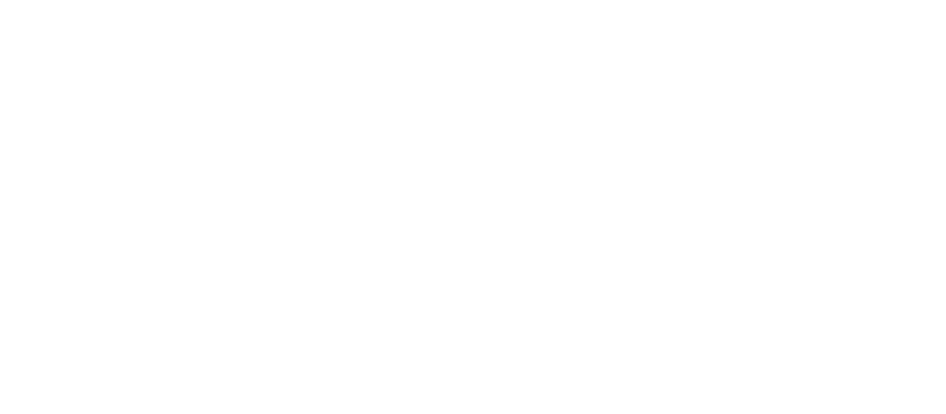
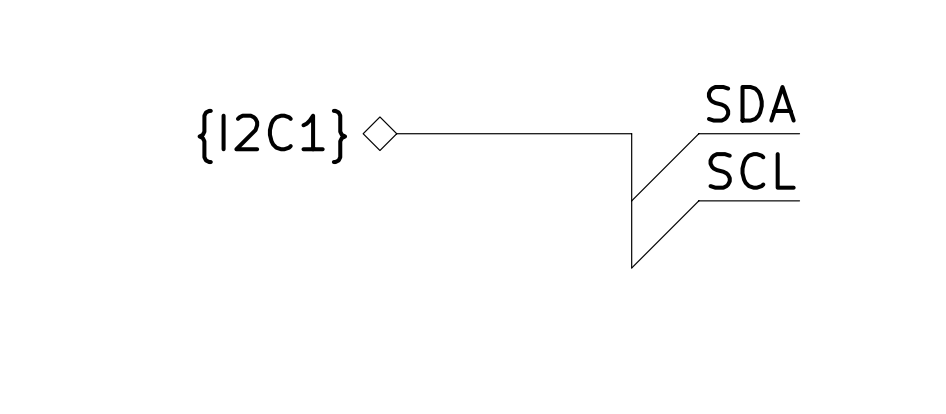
label: none -> SDA (751, 103)
bus: none -> (396, 133) (631, 133) (631, 267)
wire: none -> (799, 133) (698, 133) (631, 200)
hierarchical label: none -> {I2C1} (272, 136)
label: none -> SCL (752, 170)
wire: none -> (799, 200) (698, 200) (631, 267)

